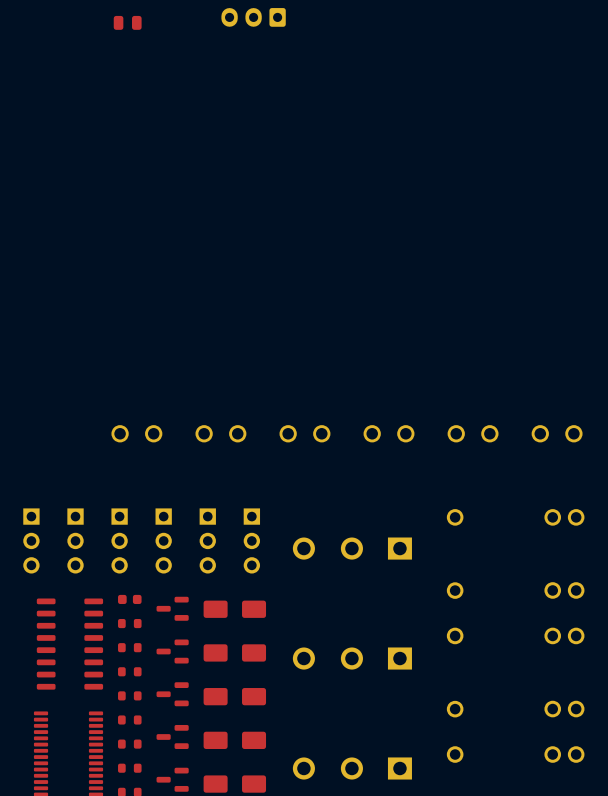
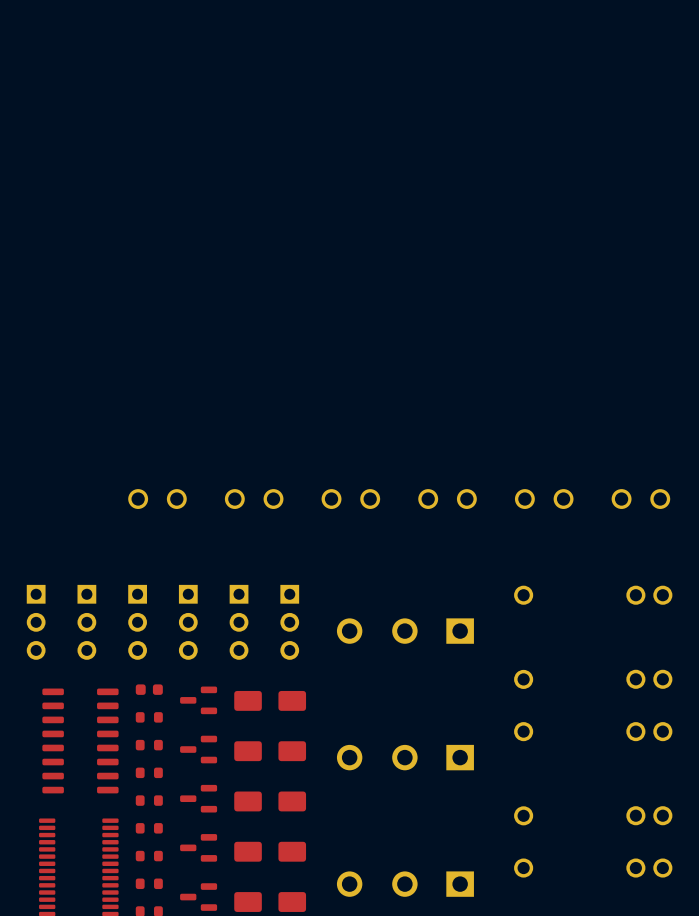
part: (253, 17) -> none
part: (127, 22) -> none

